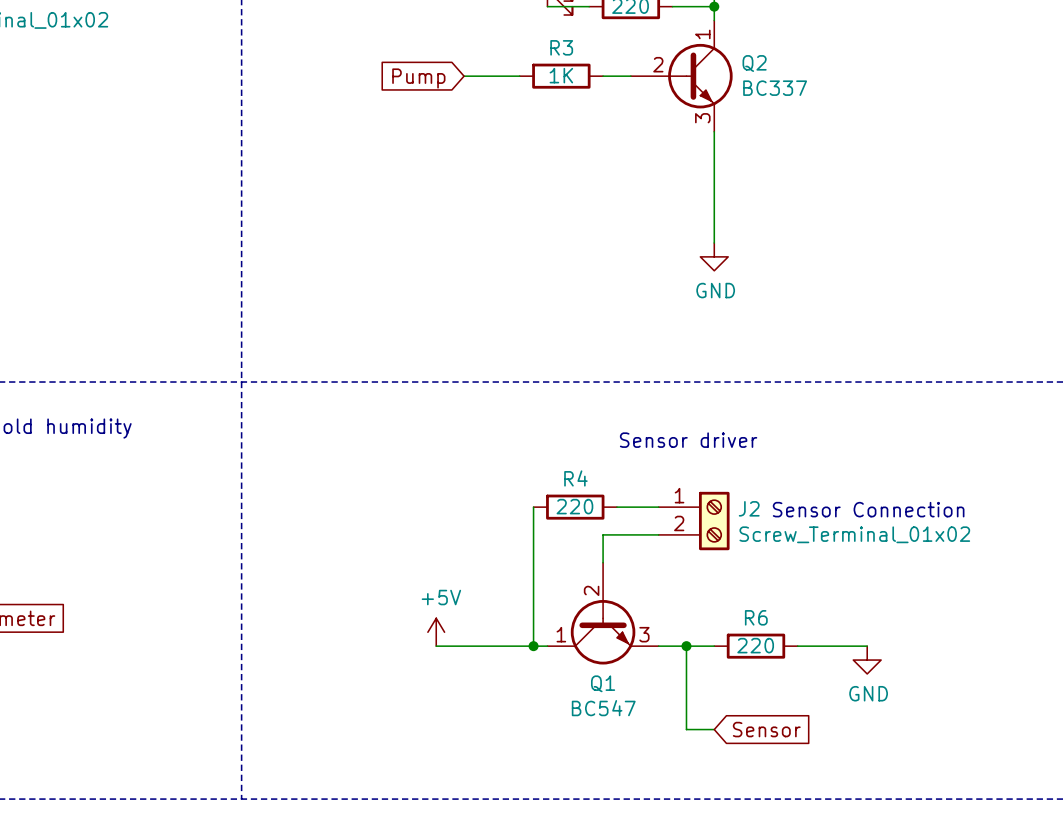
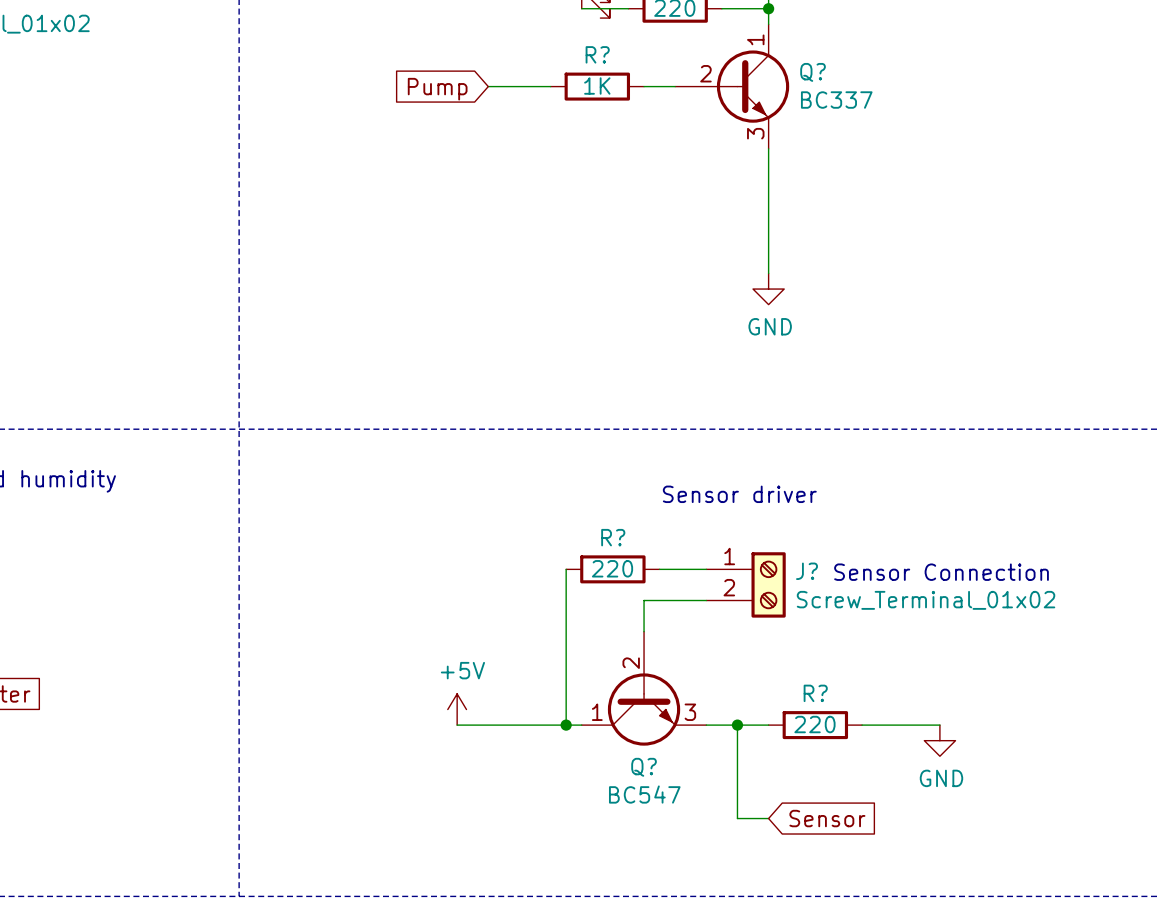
R3 name: R3 (561, 47) -> R? (597, 54)
Q2 name: Q2 (754, 63) -> Q? (813, 72)
R4 name: R4 (575, 478) -> R? (613, 537)
J2 name: J2 (749, 508) -> J? (807, 571)
R6 name: R6 (756, 617) -> R? (815, 693)
Q1 name: Q1 (603, 683) -> Q? (644, 767)

